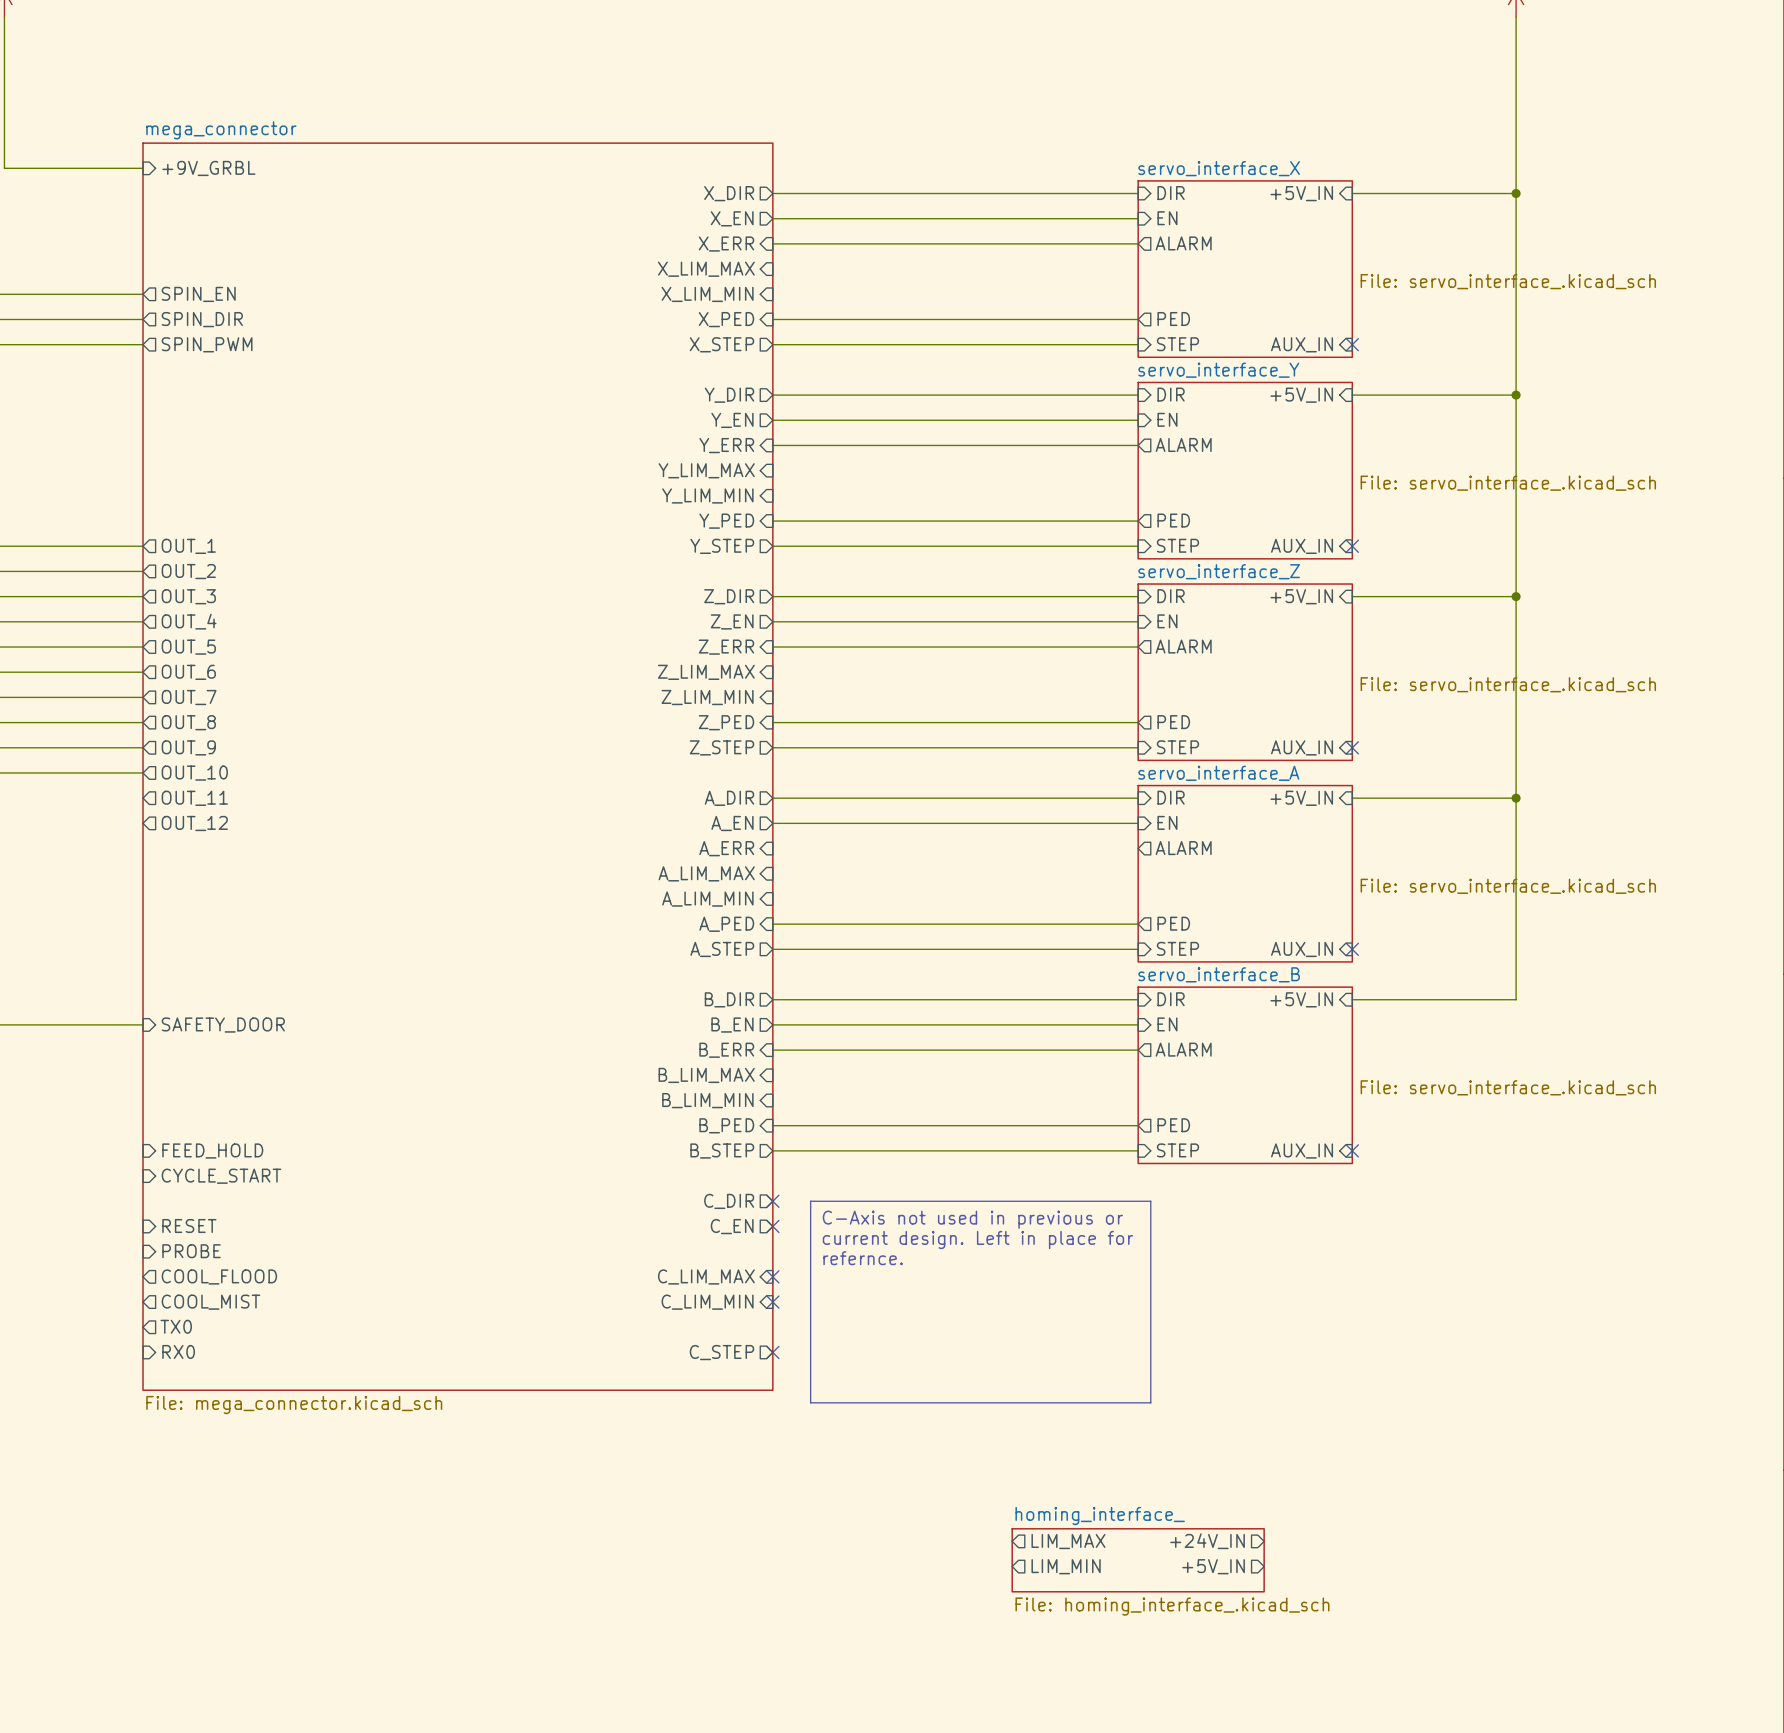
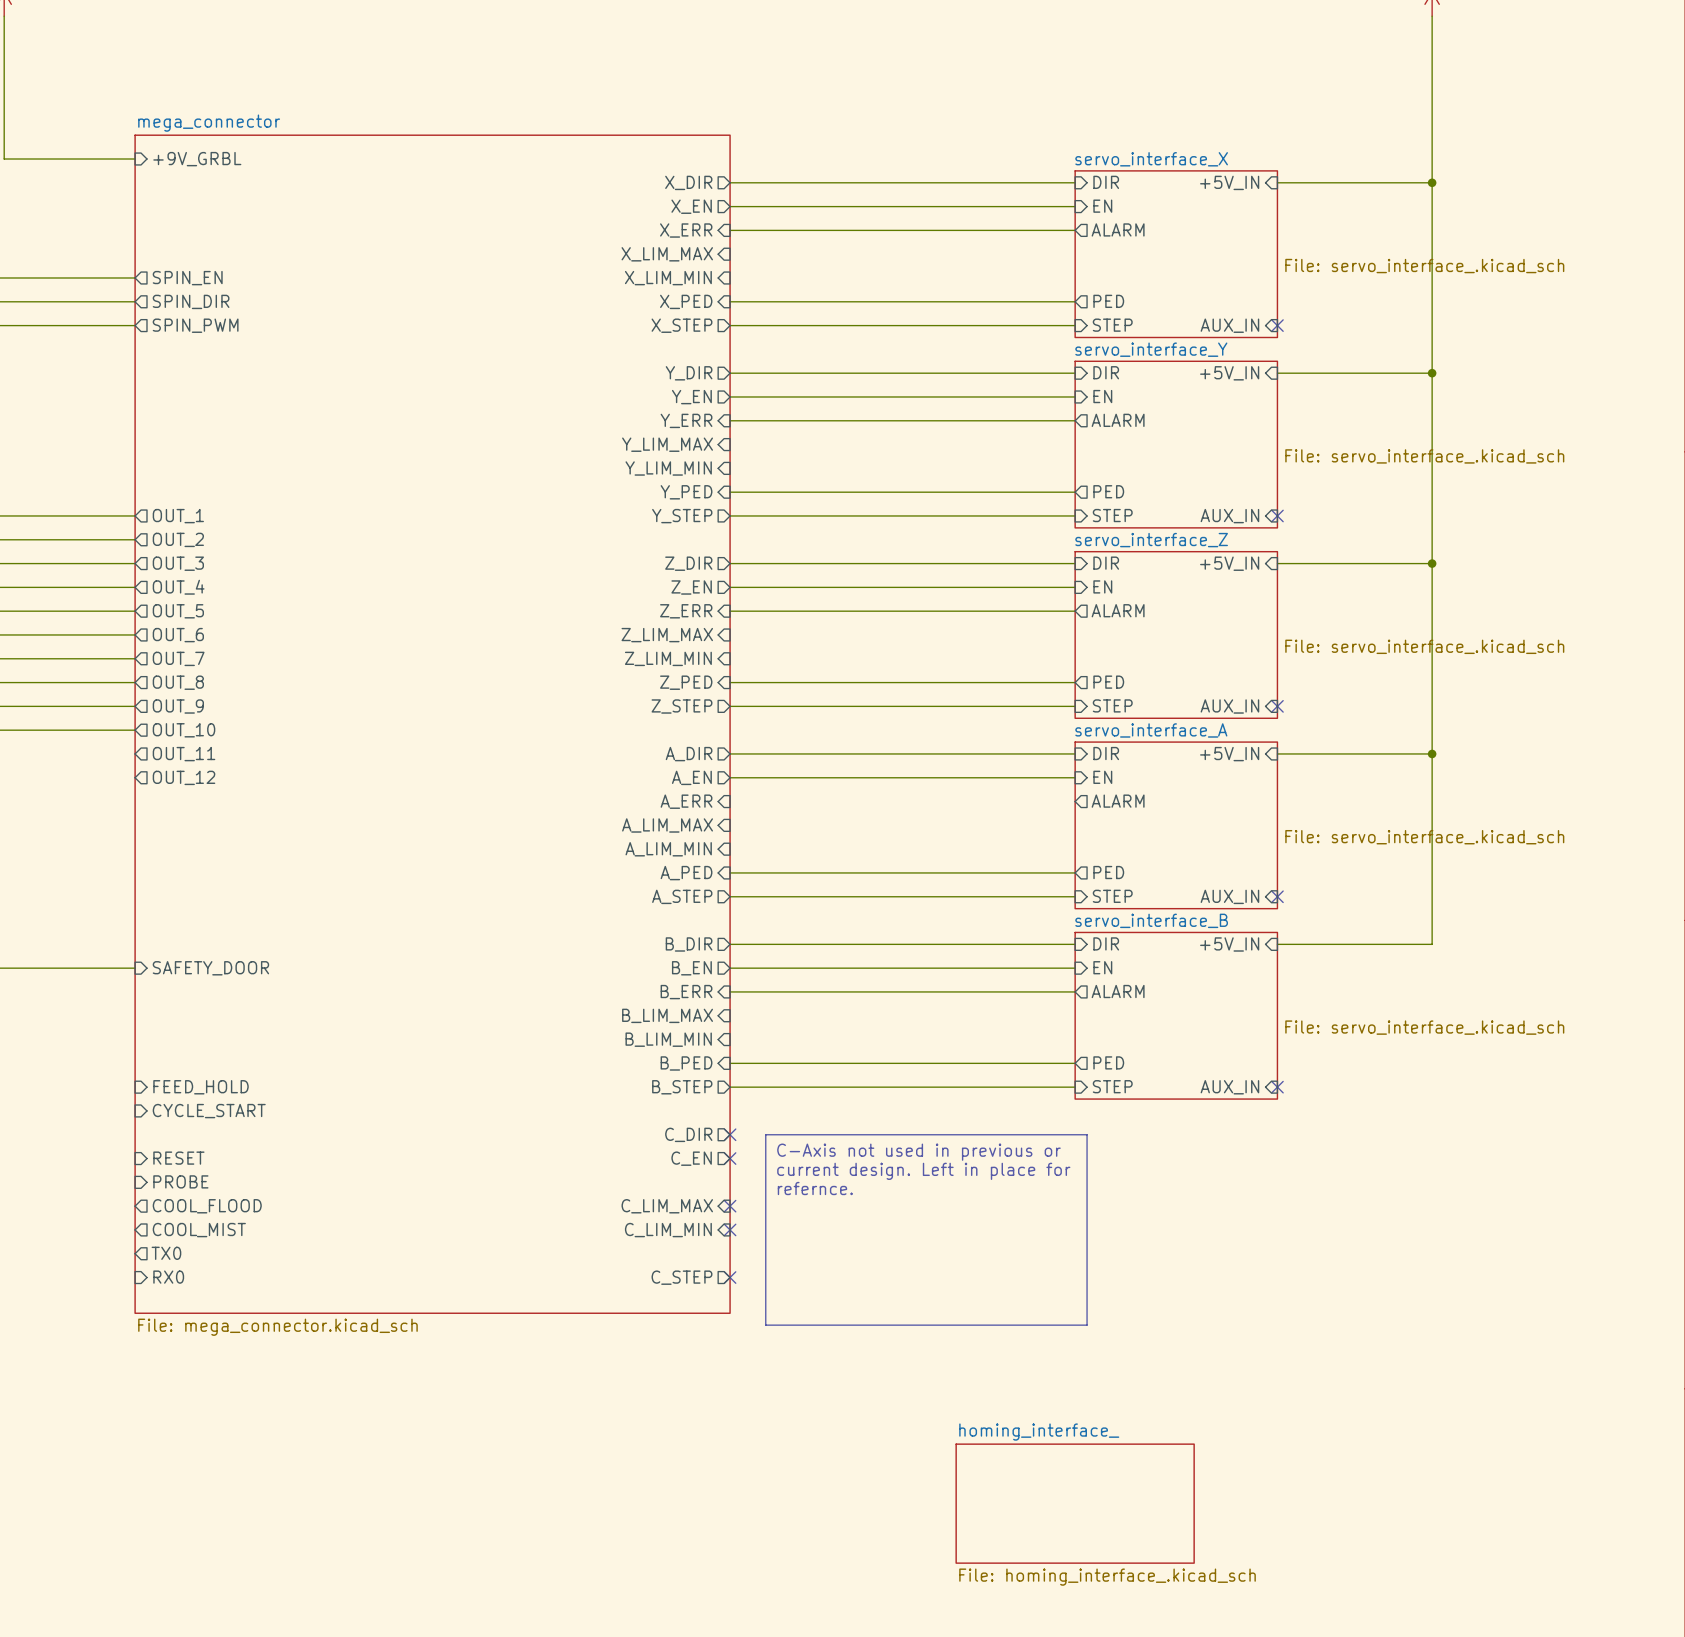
sheet pin: LIM_MAX (1068, 1541) -> none
sheet pin: +24V_IN (1207, 1541) -> none
sheet homing_interface_: File: homing_interface_.kicad_sch (1138, 1560) -> none
sheet pin: LIM_MIN (1066, 1566) -> none
sheet pin: +5V_IN (1213, 1566) -> none
sheet homing_interface_: none -> File: homing_interface_.kicad_sch (1075, 1503)

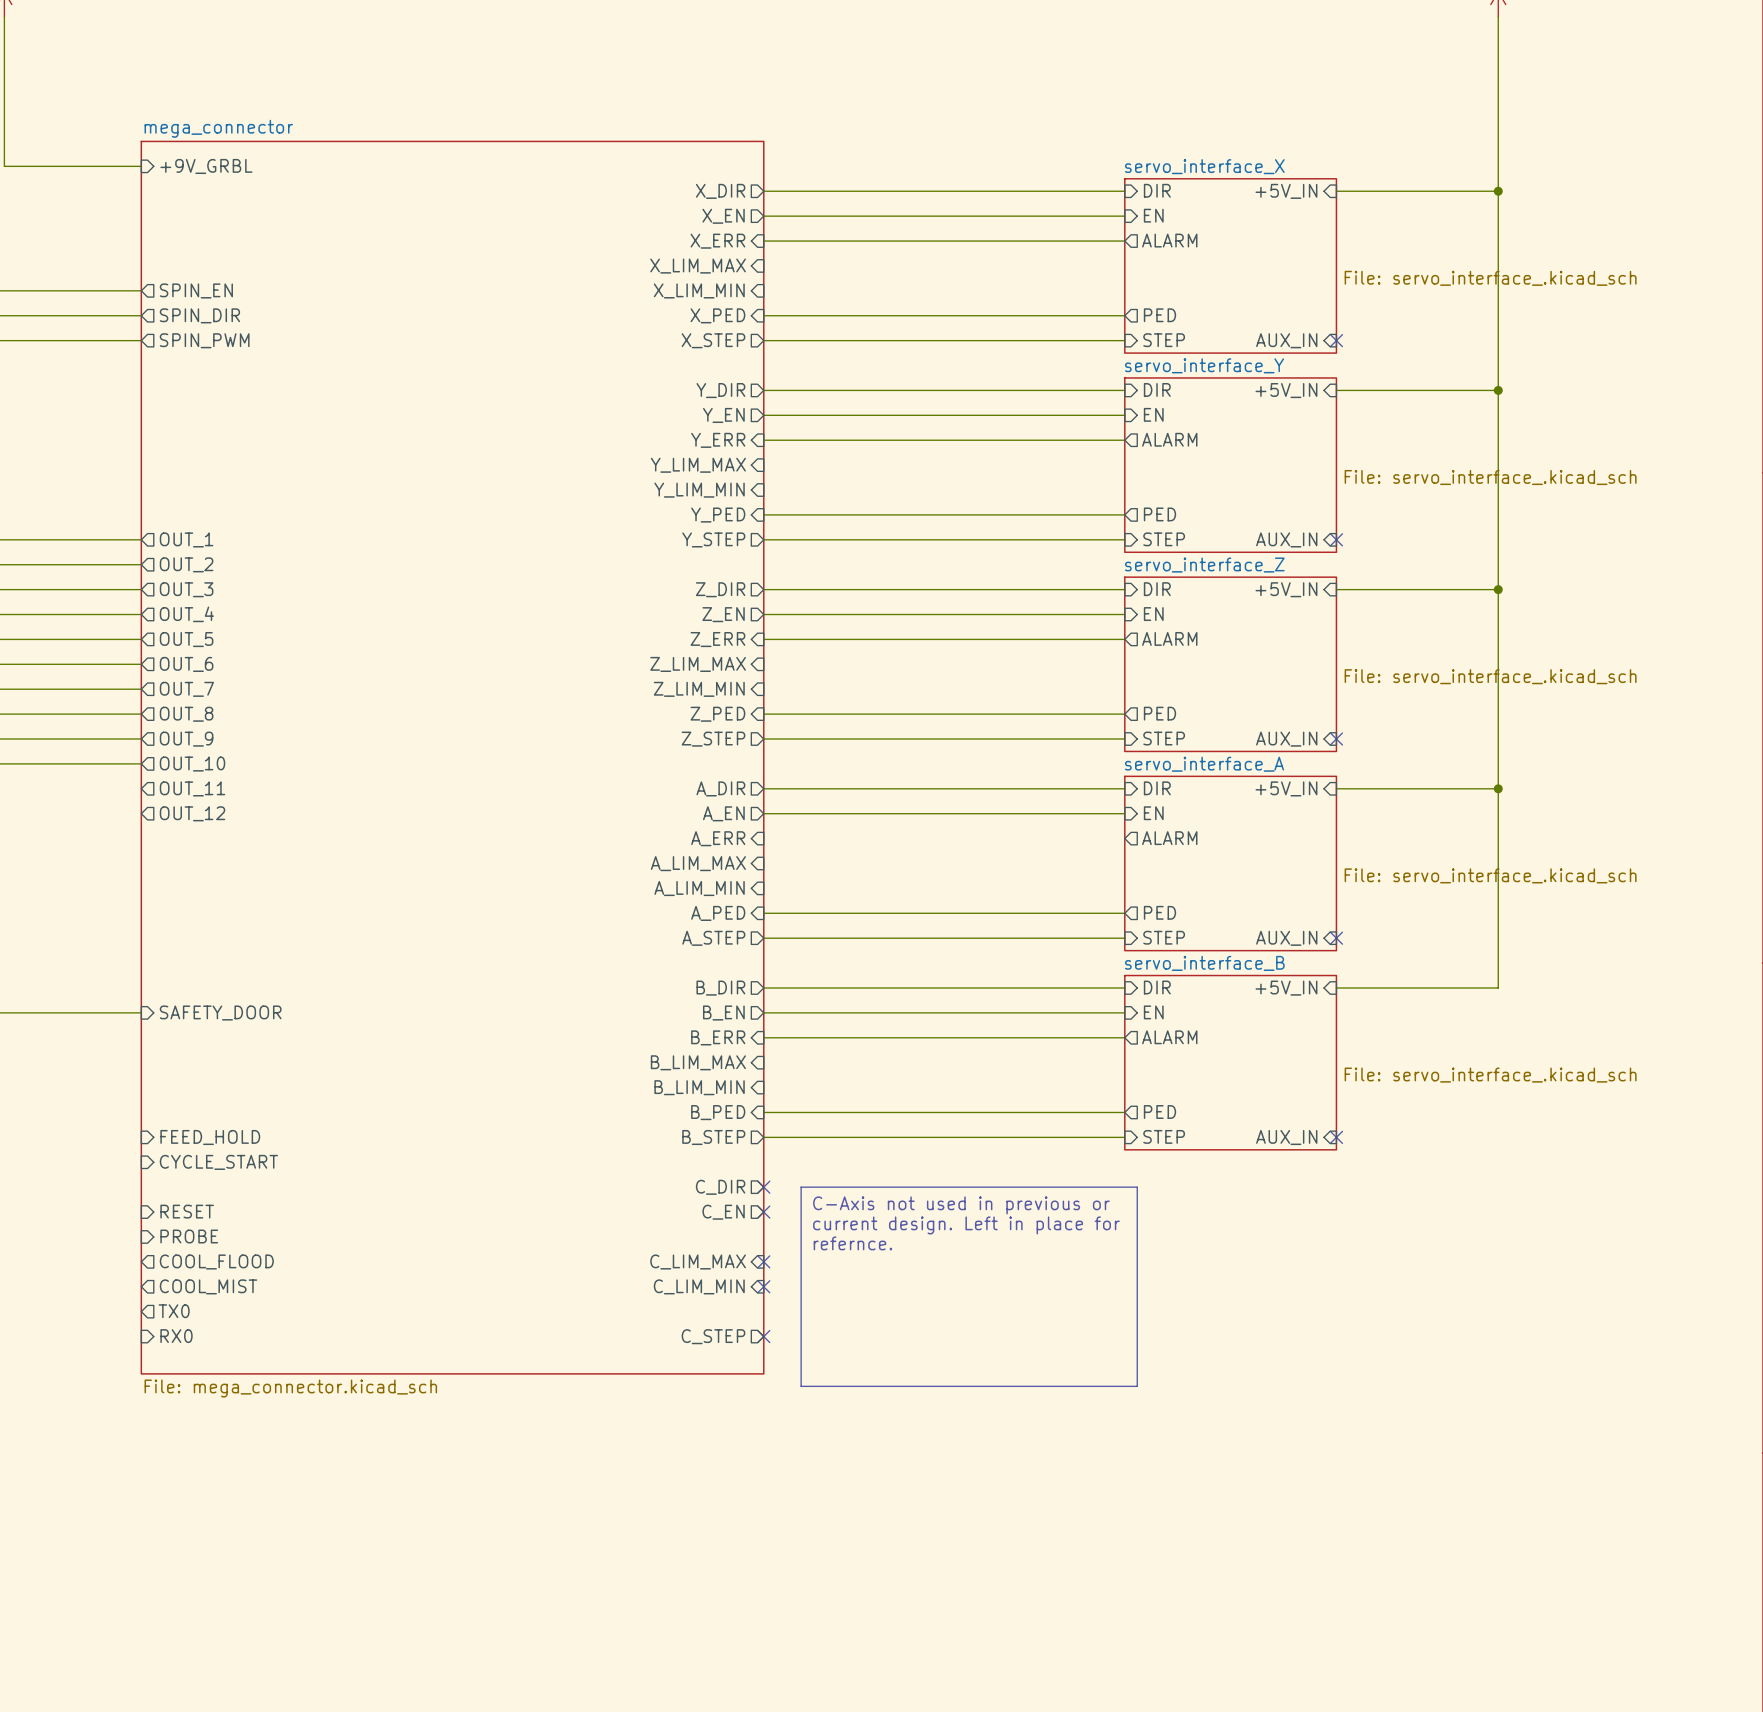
sheet homing_interface_: File: homing_interface_.kicad_sch (1075, 1503) -> none

